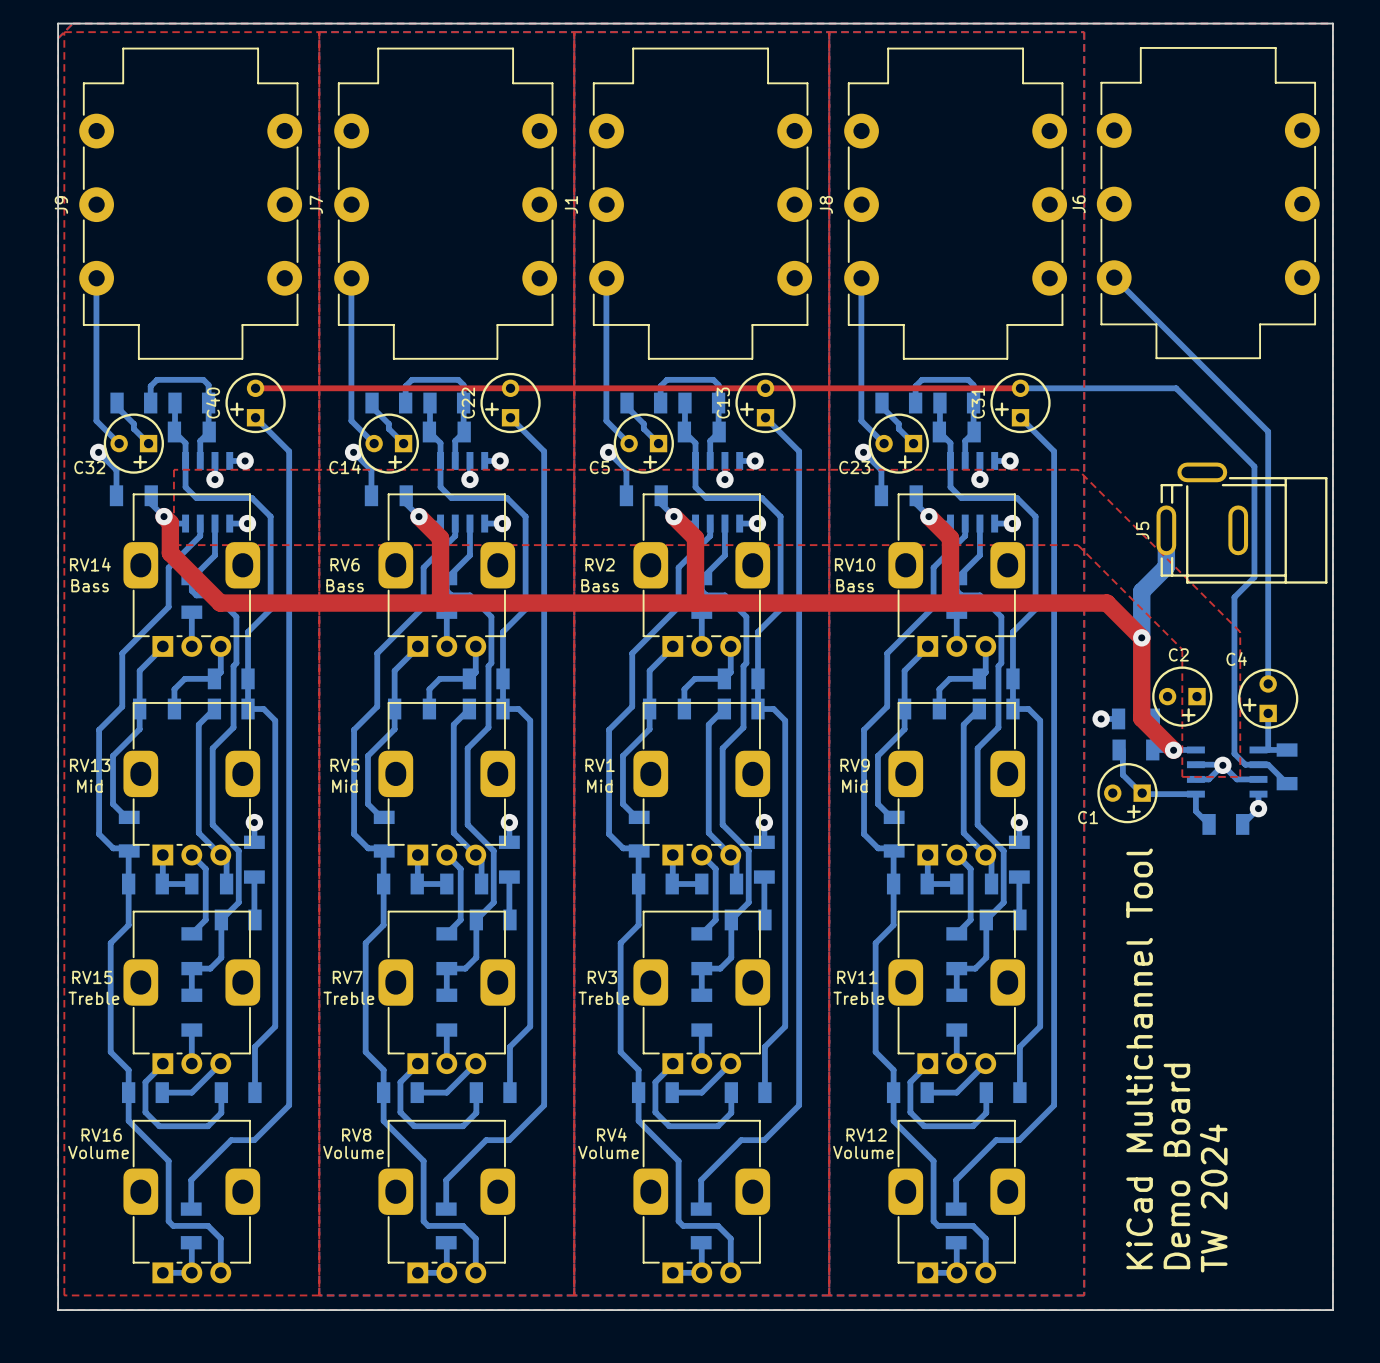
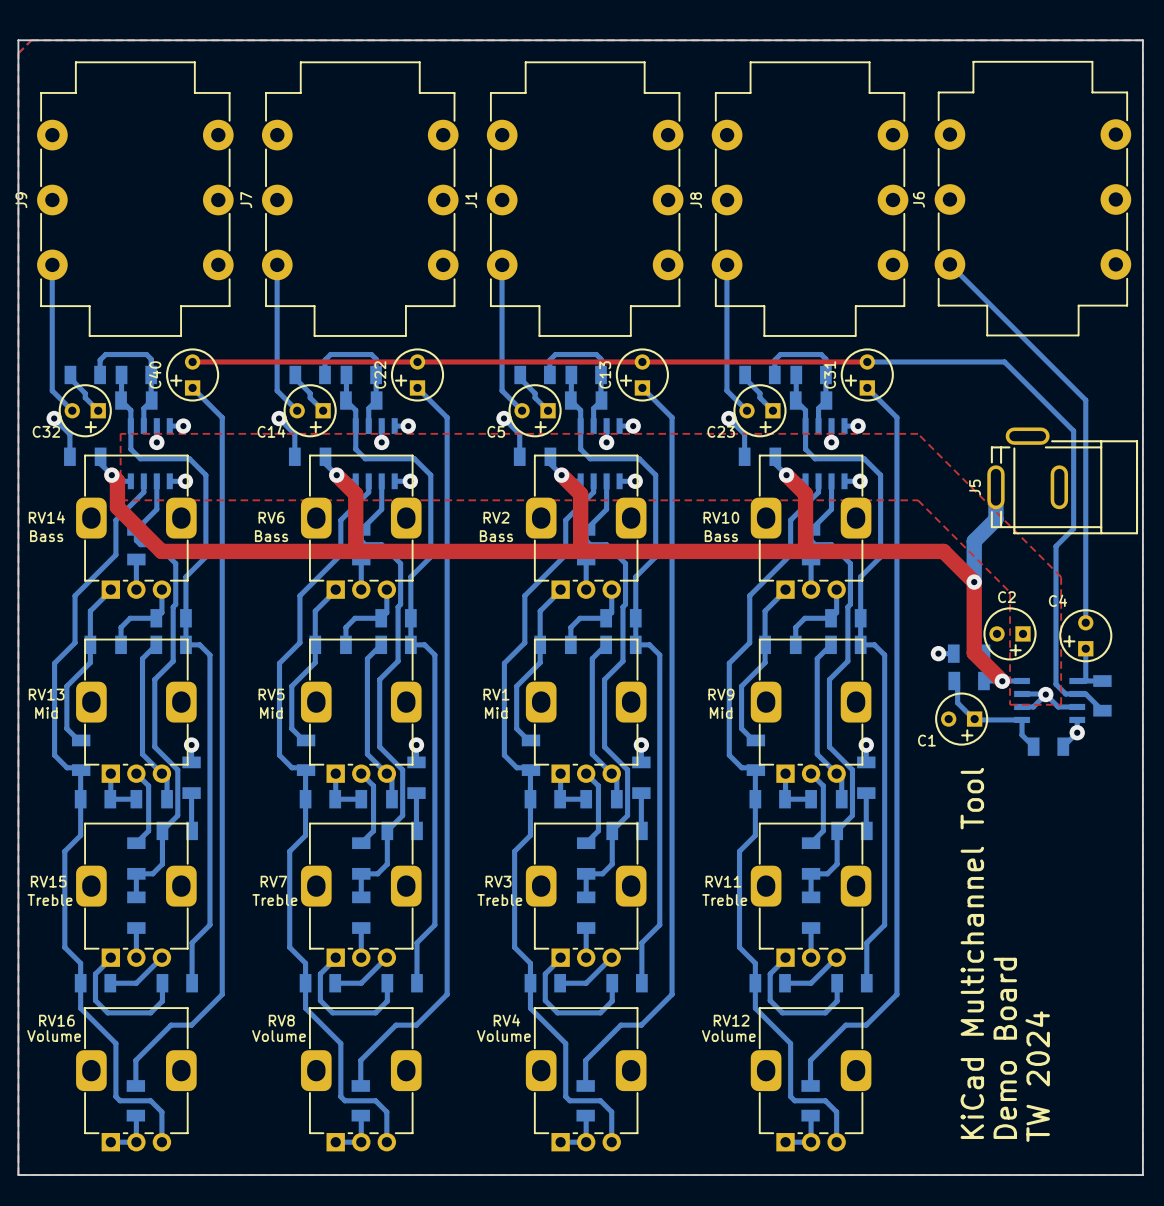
top zone outline: (64, 32) (1084, 32) (1084, 1295) (64, 1295) (64, 32) -> none
top zone outline: (319, 32) (319, 1295) -> none
top zone outline: (574, 32) (574, 1295) -> none
top zone outline: (829, 32) (829, 1295) -> none

